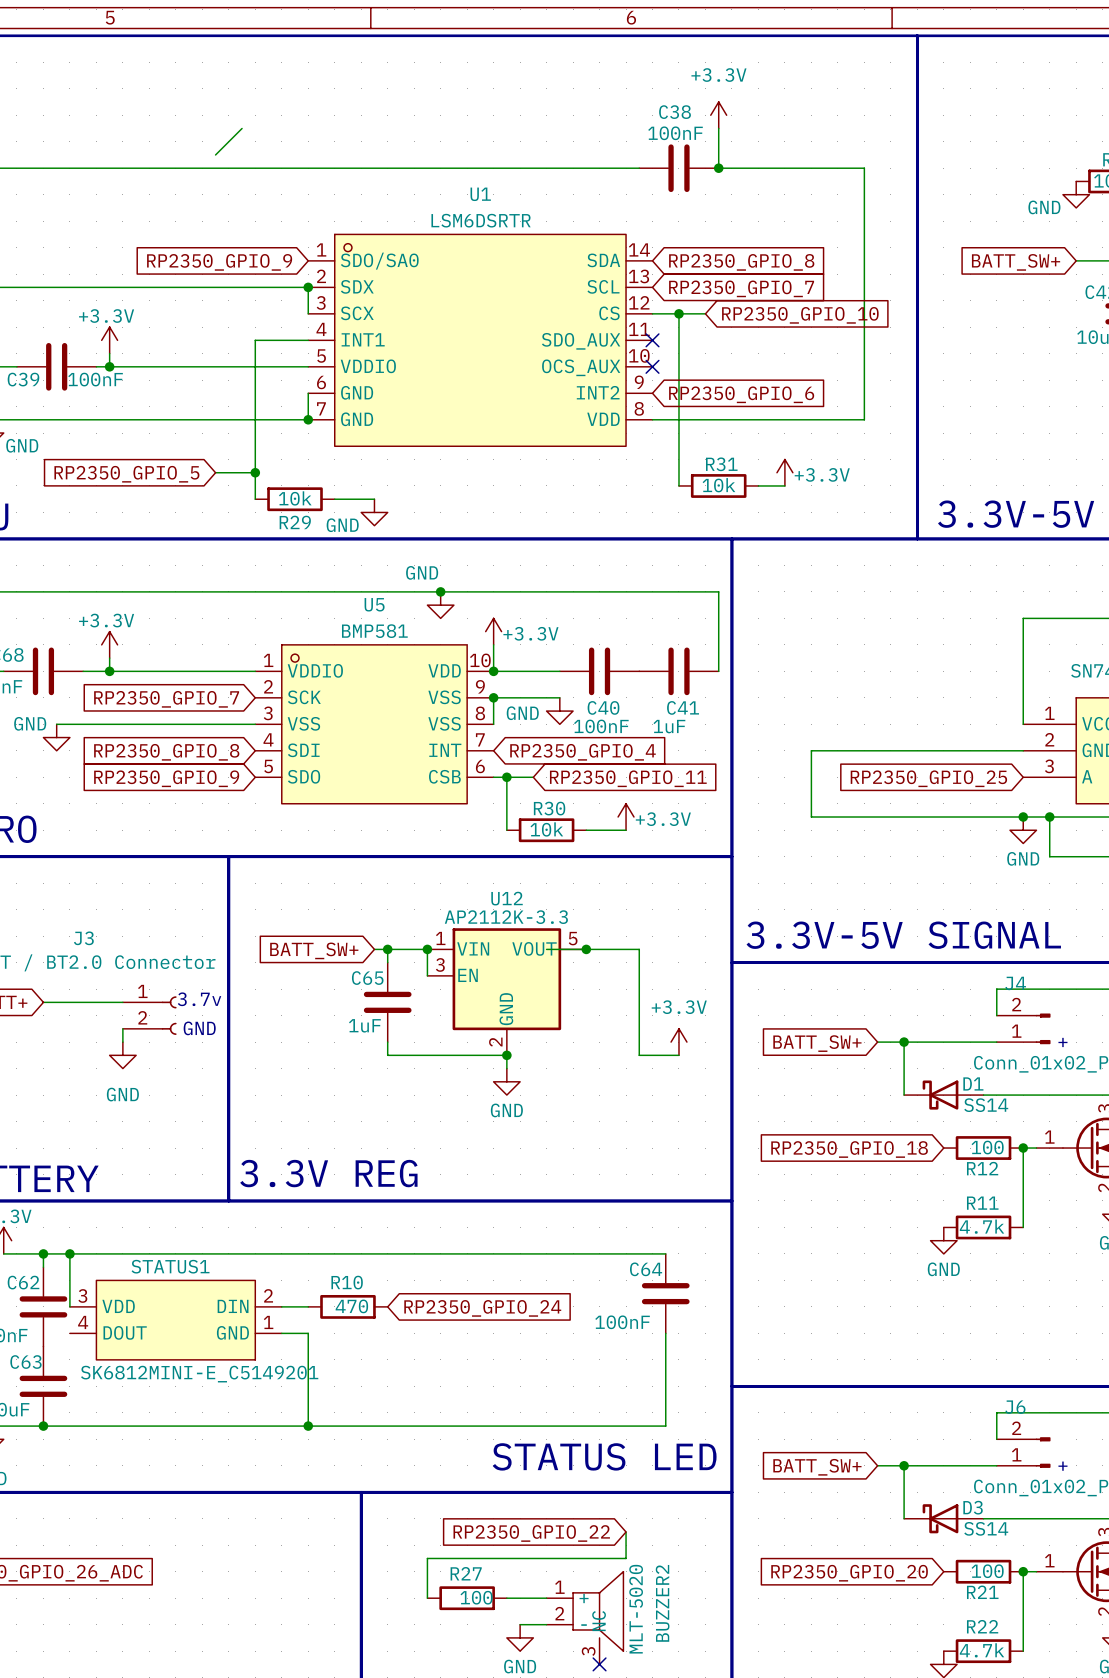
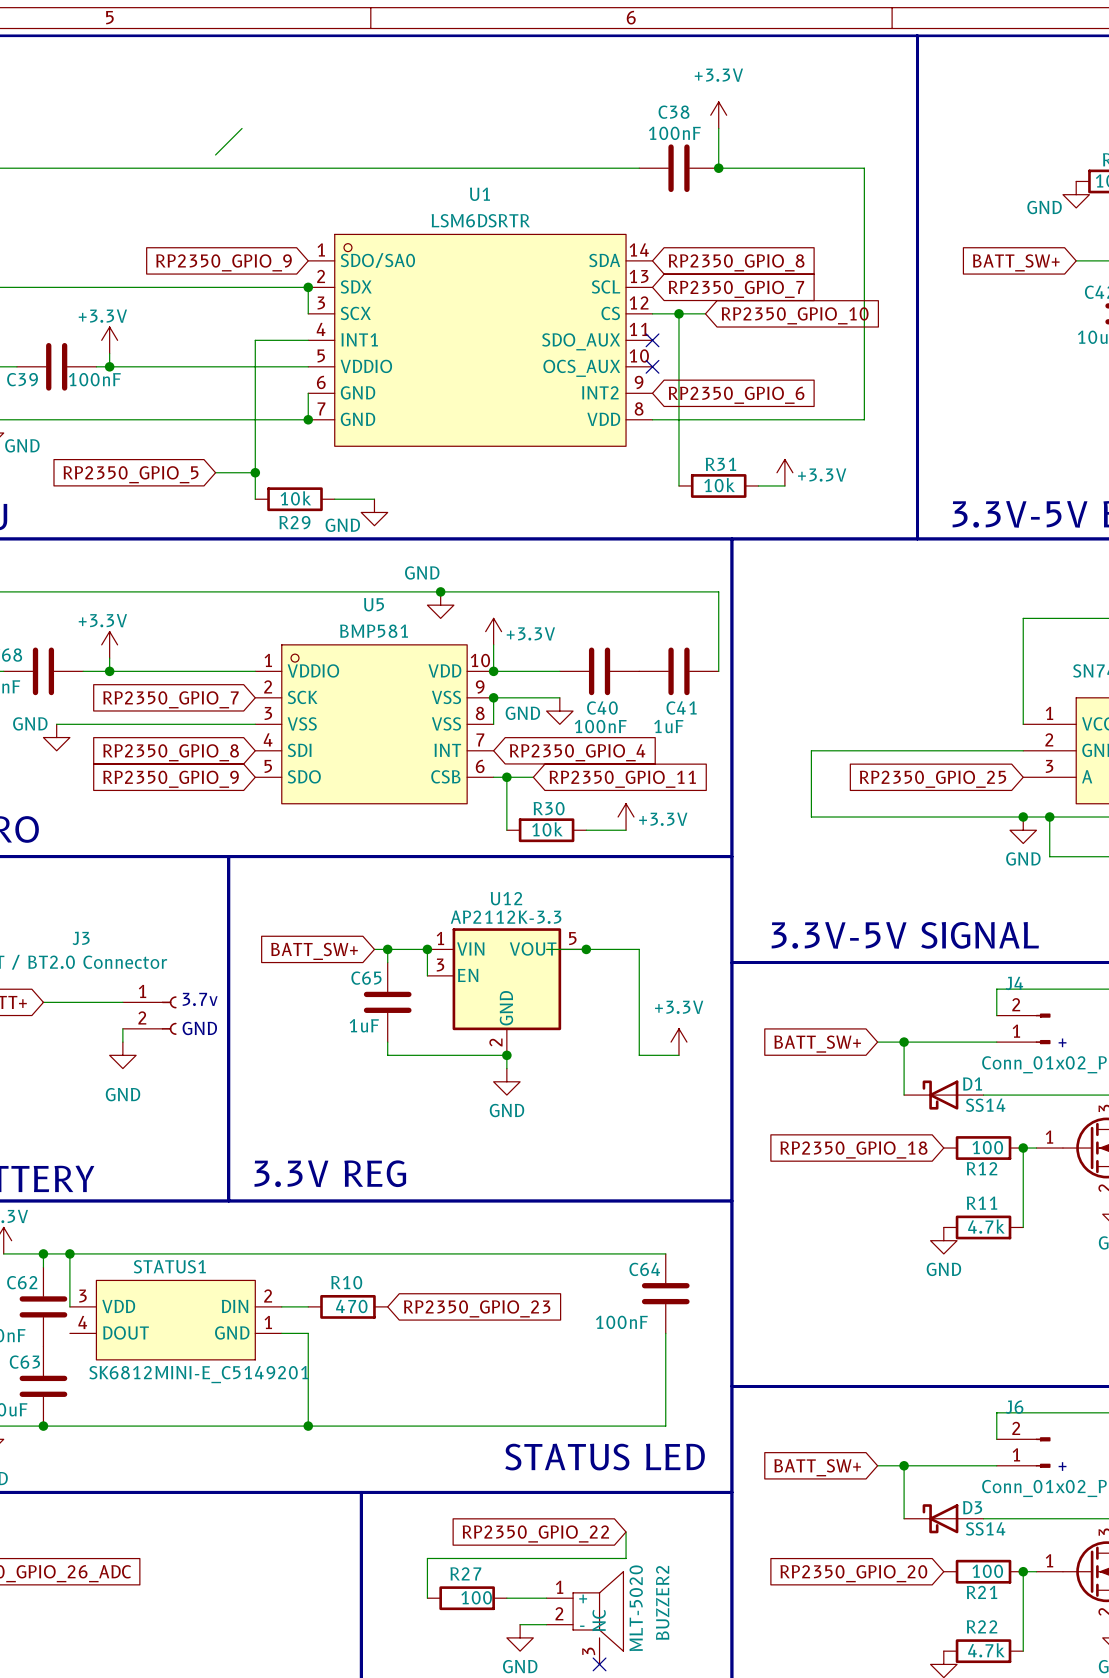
global label: RP2350_GPIO_24 (482, 1308) -> RP2350_GPIO_23 (477, 1308)

